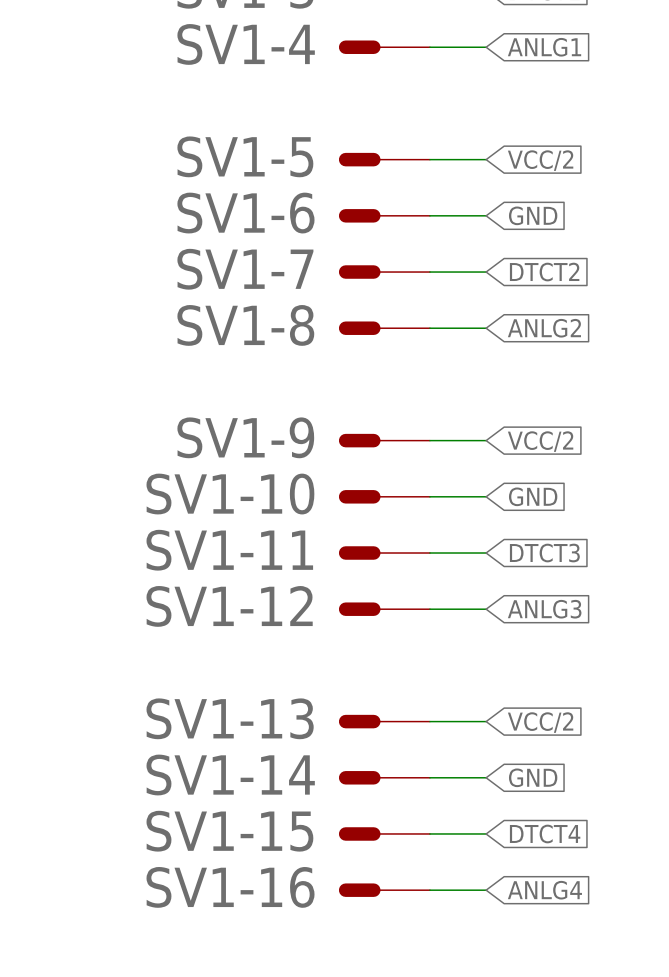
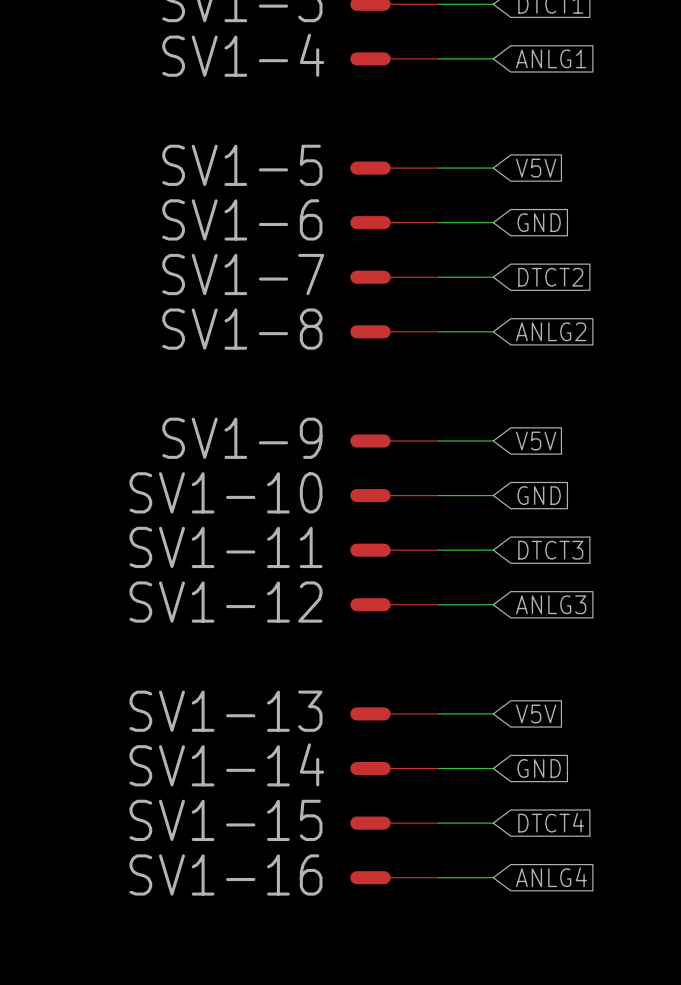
global label: VCC/2 (540, 160) -> V5V (536, 168)
global label: VCC/2 (540, 441) -> V5V (536, 440)
global label: VCC/2 (540, 722) -> V5V (536, 713)

